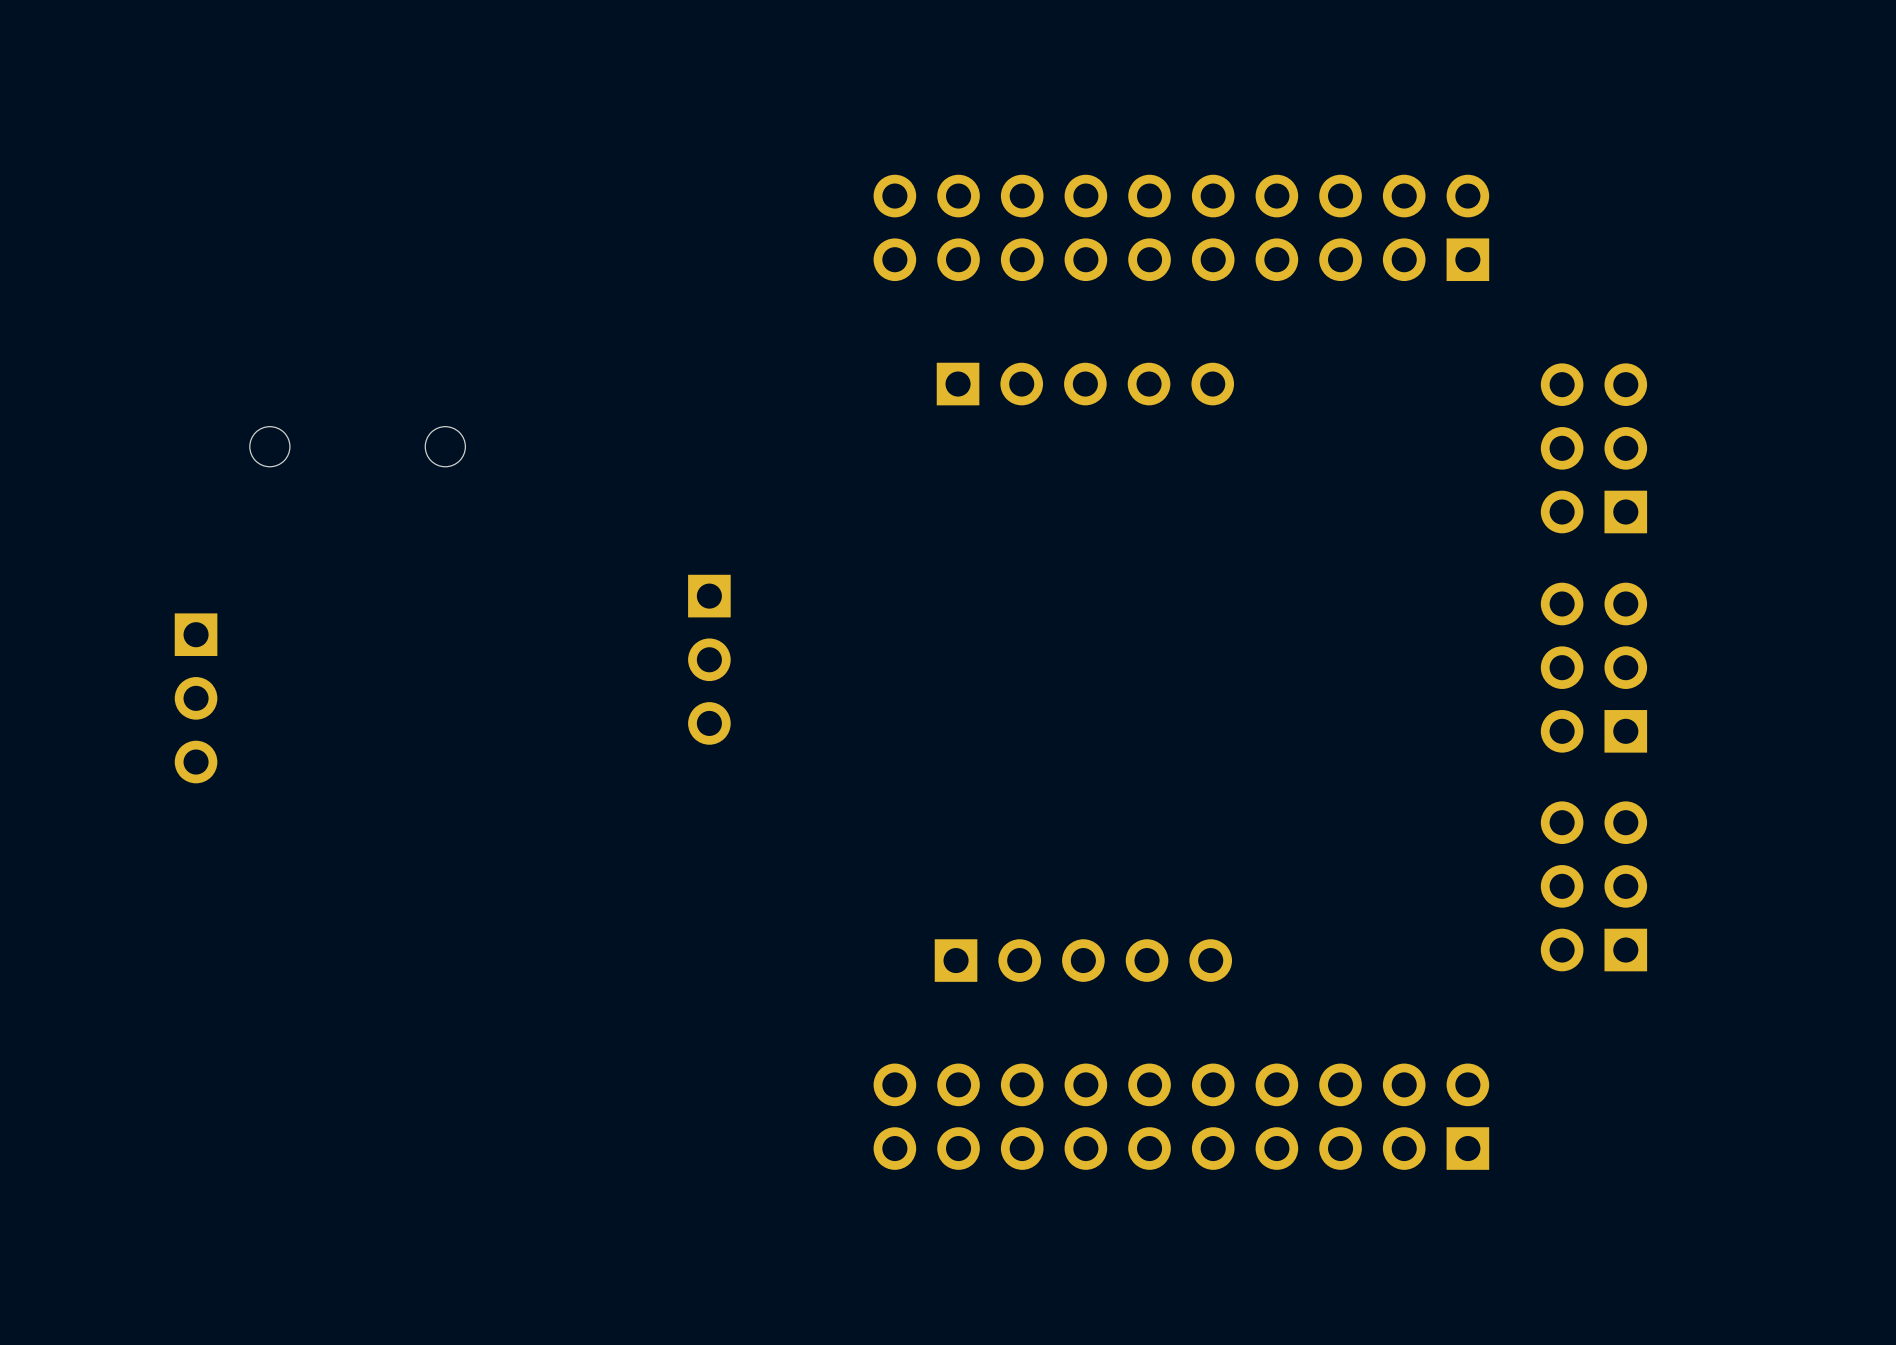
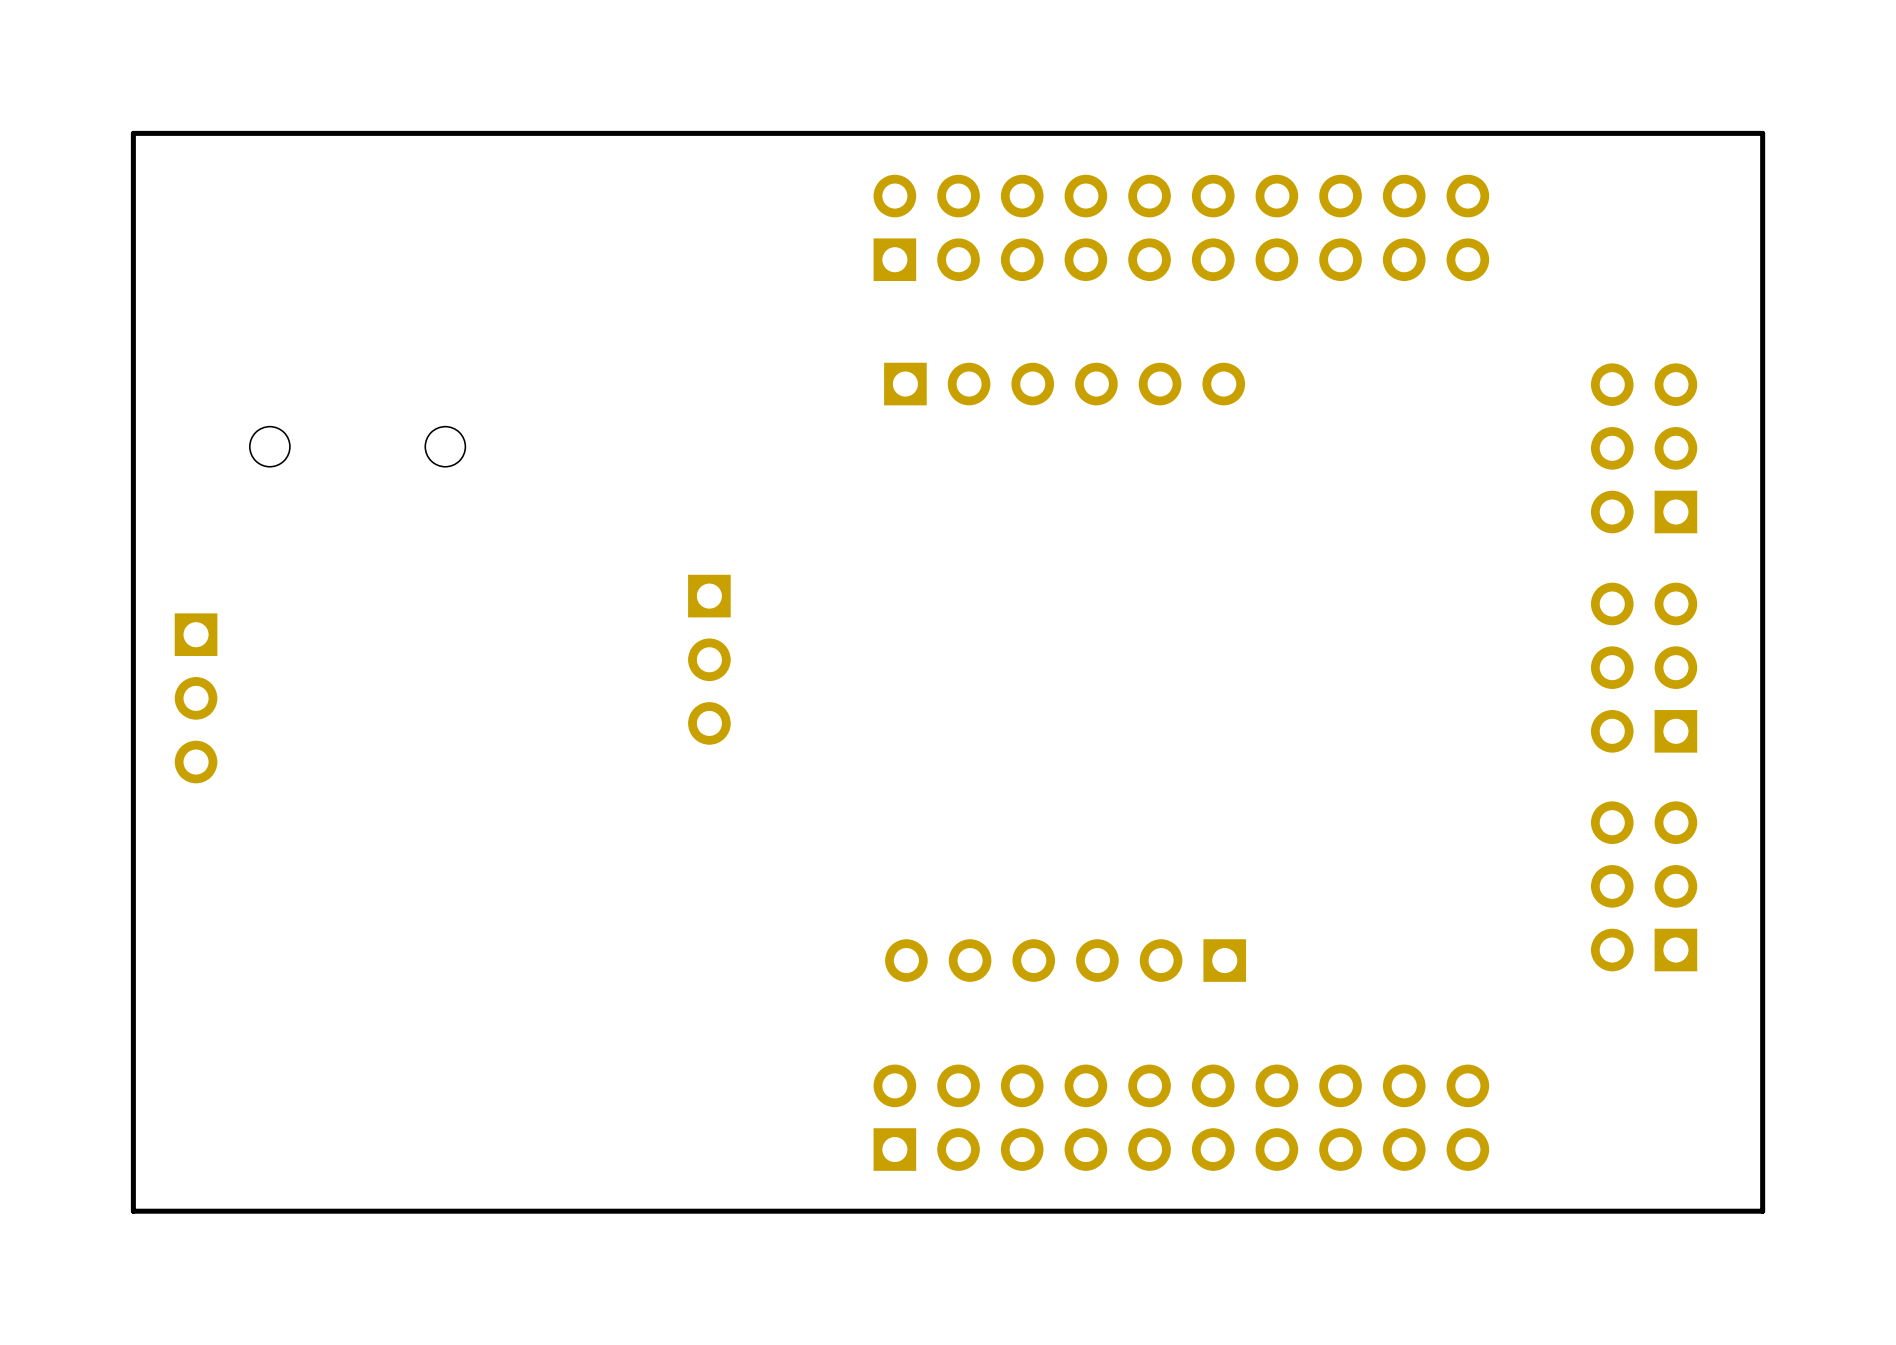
board edge: none -> (1762, 133) (133, 133) (133, 1211) (1762, 1211) (1762, 133)
part footprint: [873, 174, 1490, 282] -> [873, 174, 1490, 282]
part footprint: [936, 362, 1235, 406] -> [884, 362, 1246, 406]
part position: (1593, 448) -> (1644, 448)
part position: (1593, 667) -> (1644, 667)
part position: (1593, 886) -> (1644, 886)
part footprint: [934, 939, 1233, 982] -> [885, 939, 1247, 982]
part footprint: [873, 1063, 1490, 1170] -> [873, 1064, 1490, 1171]

